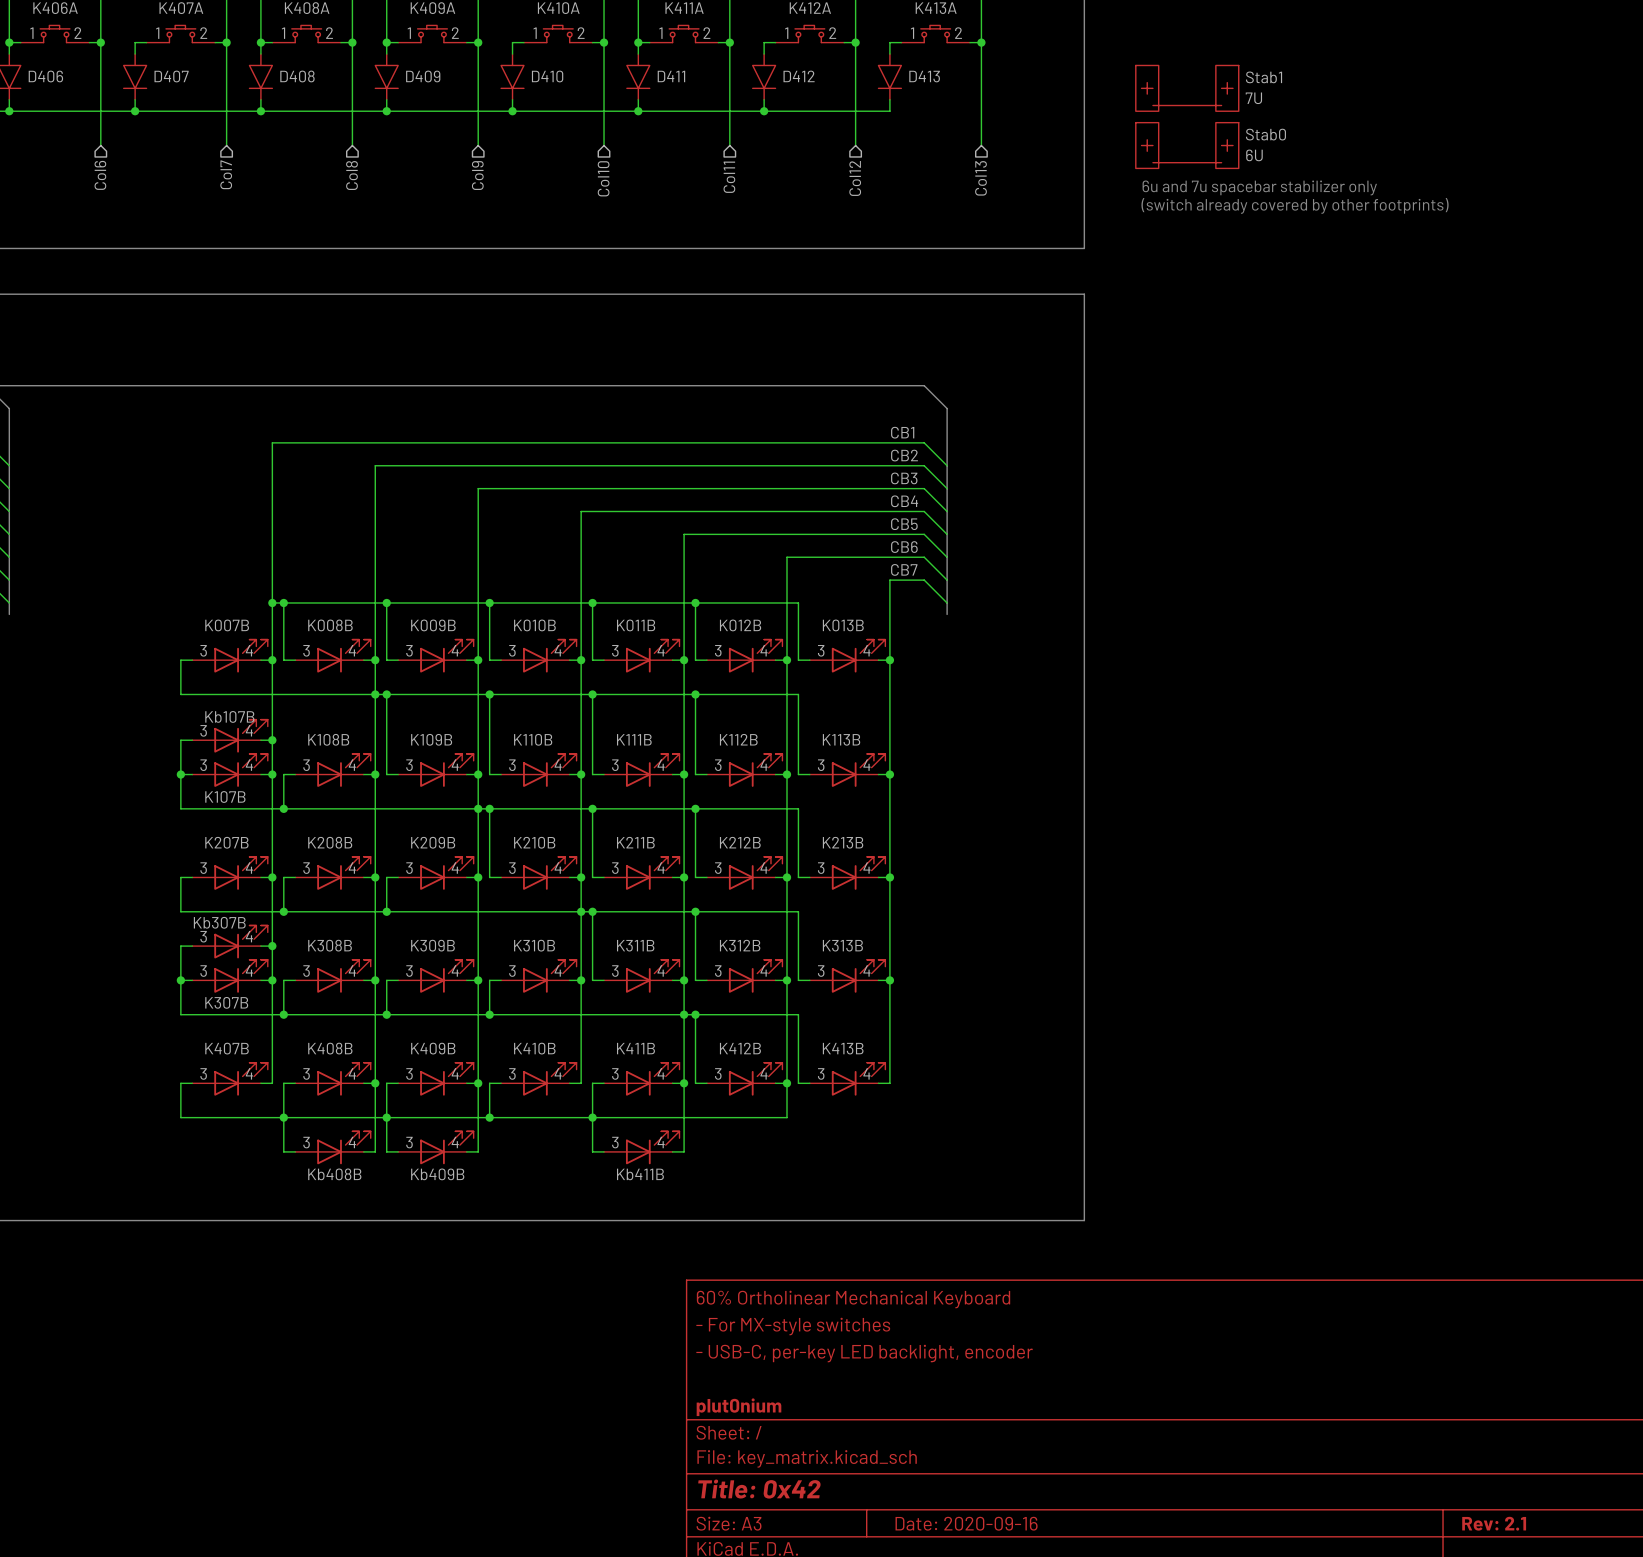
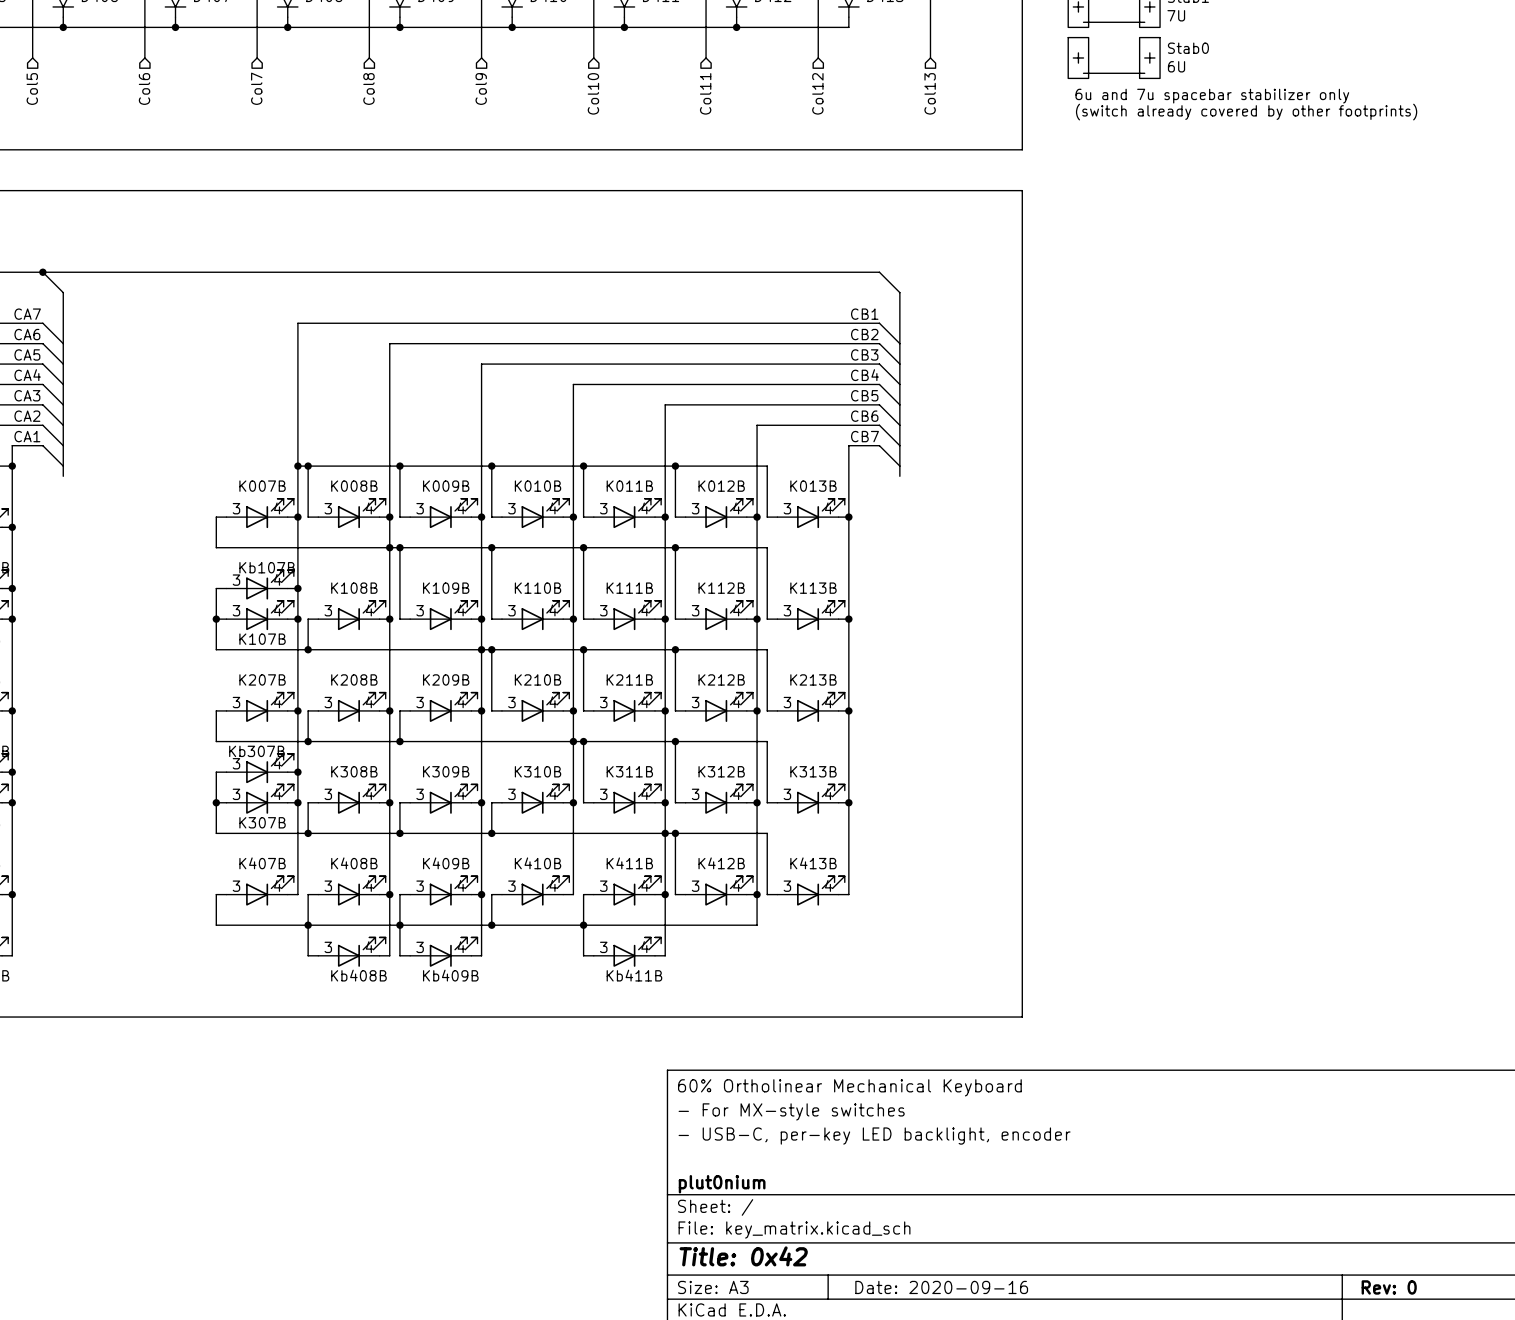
title block: Rev: 2.1 (1494, 1523) -> Rev: 0 (1389, 1287)

